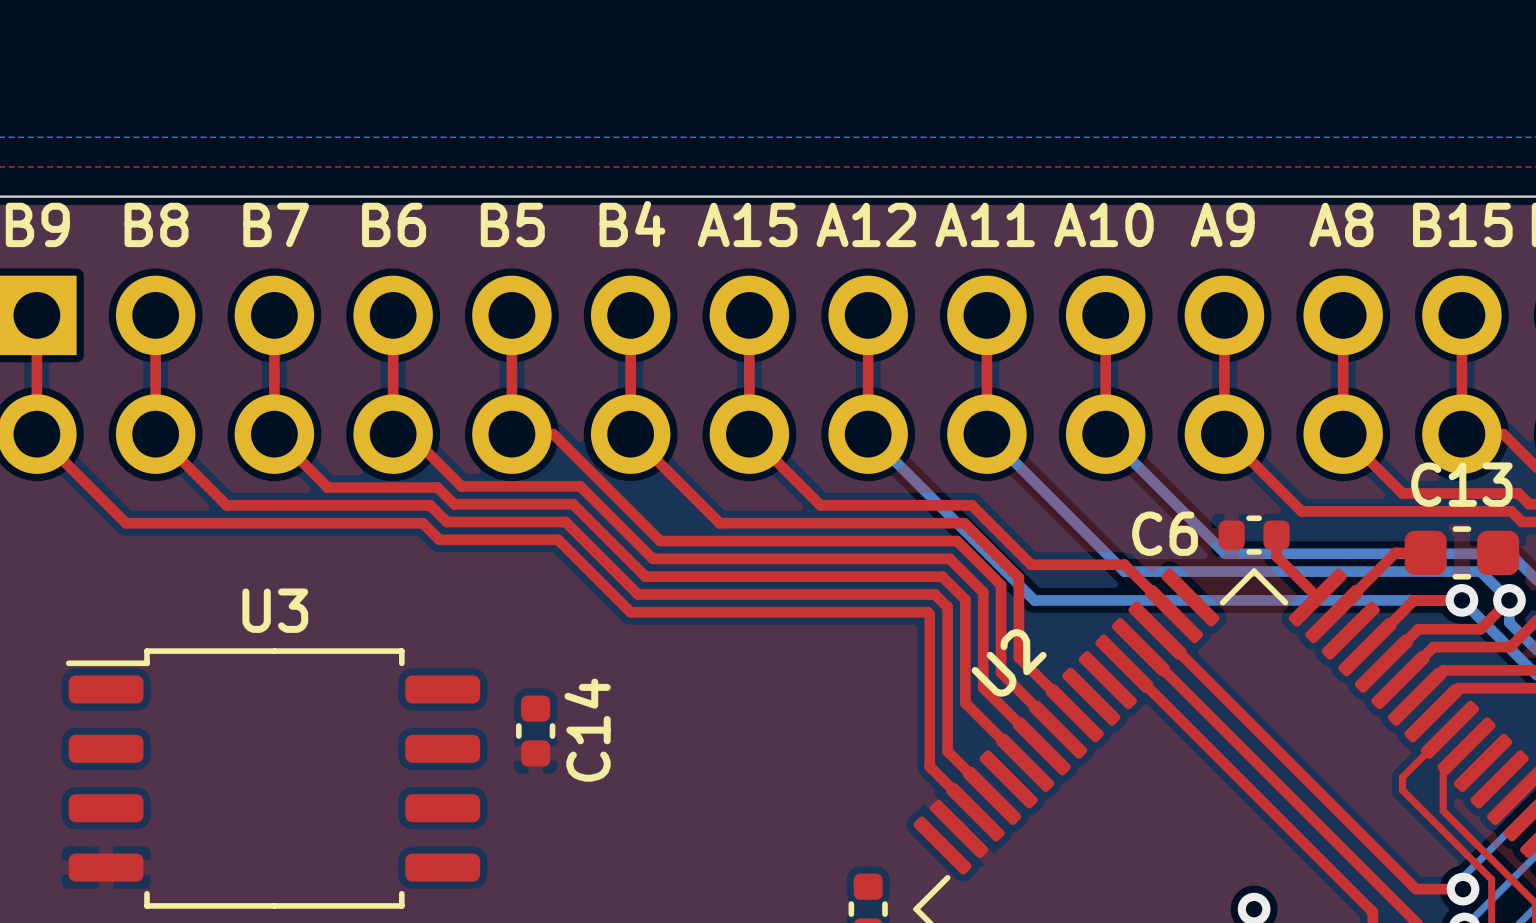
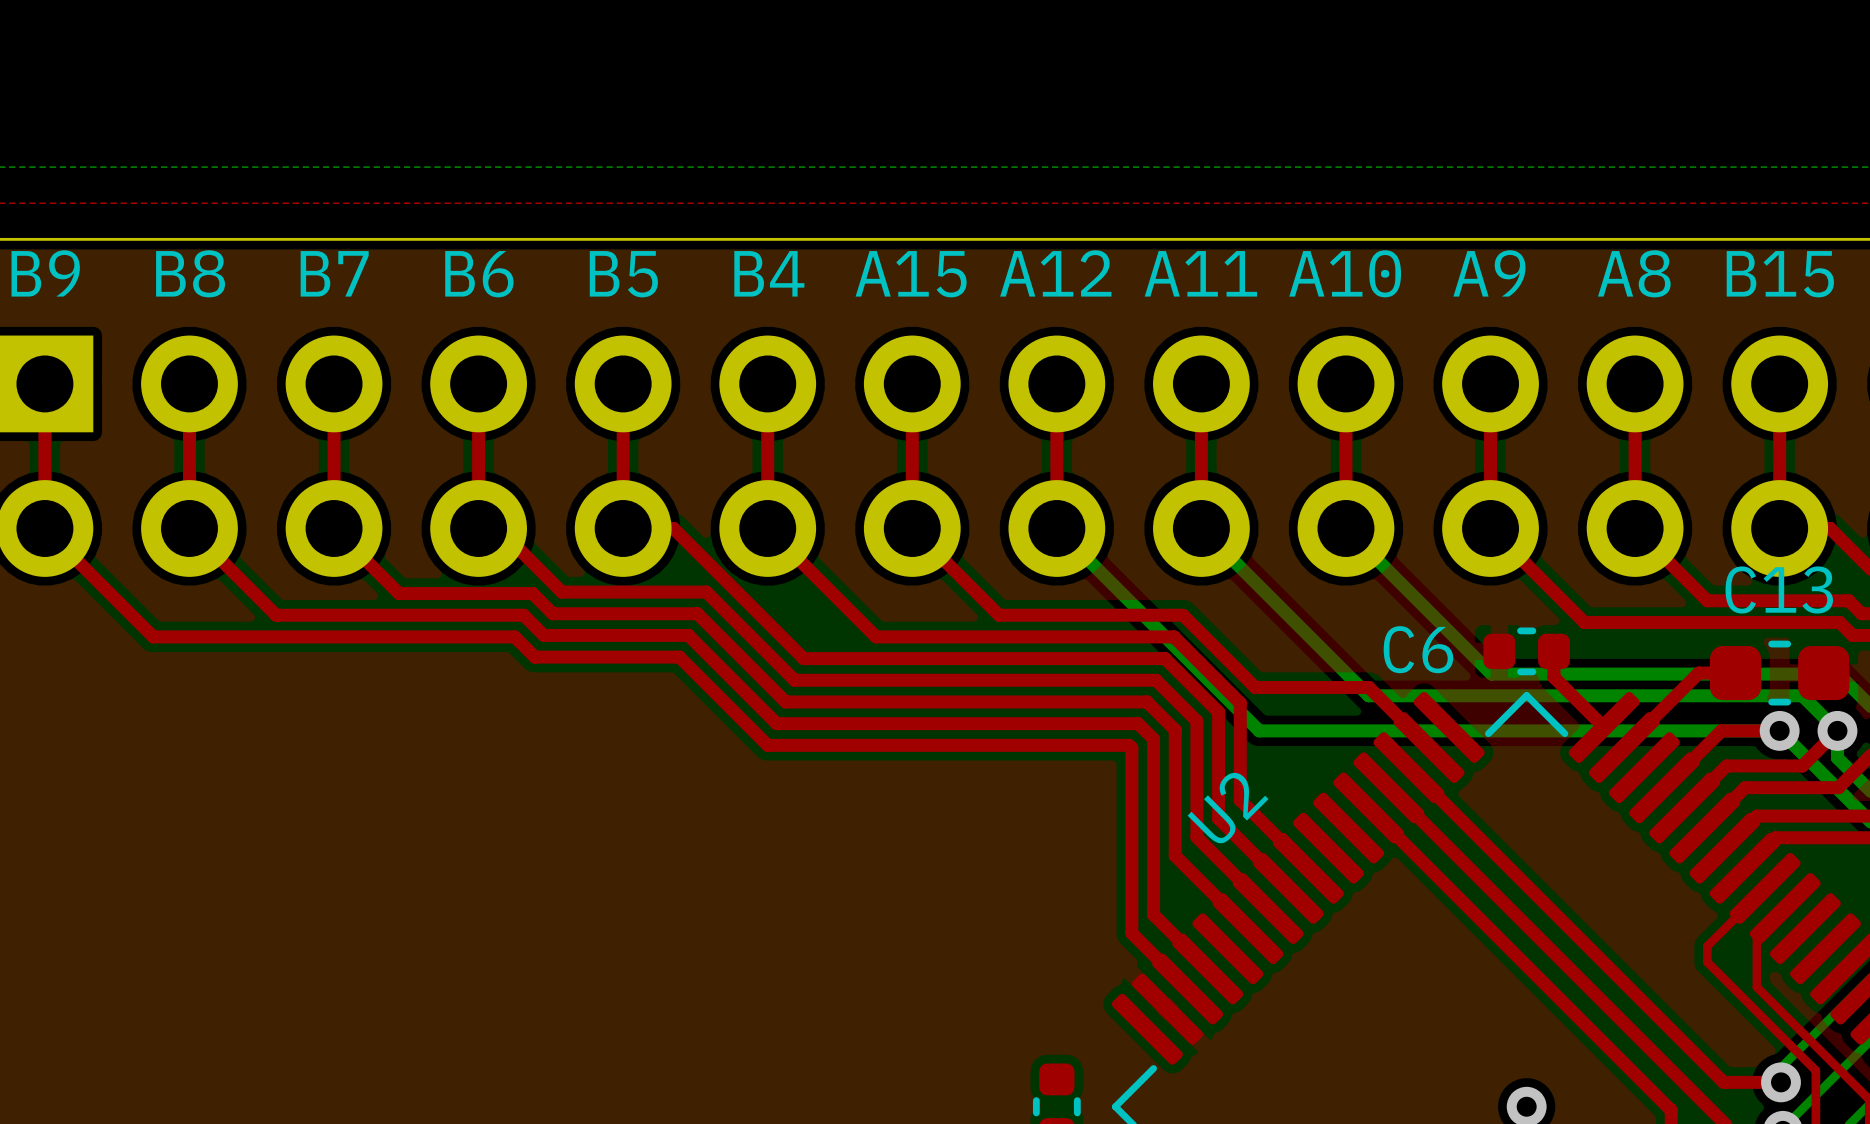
C14: (535, 731) -> none
U3: (273, 778) -> none

